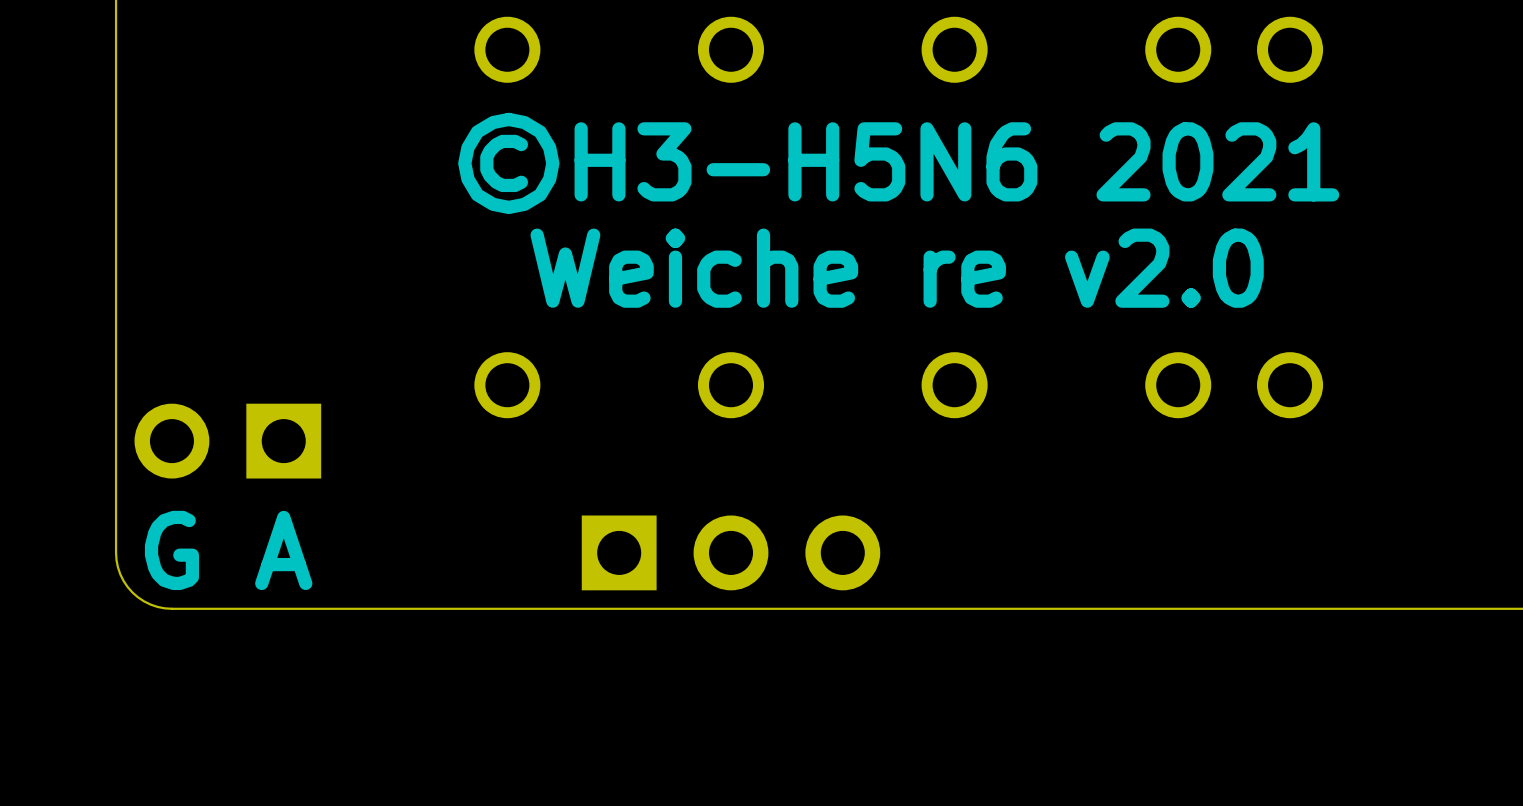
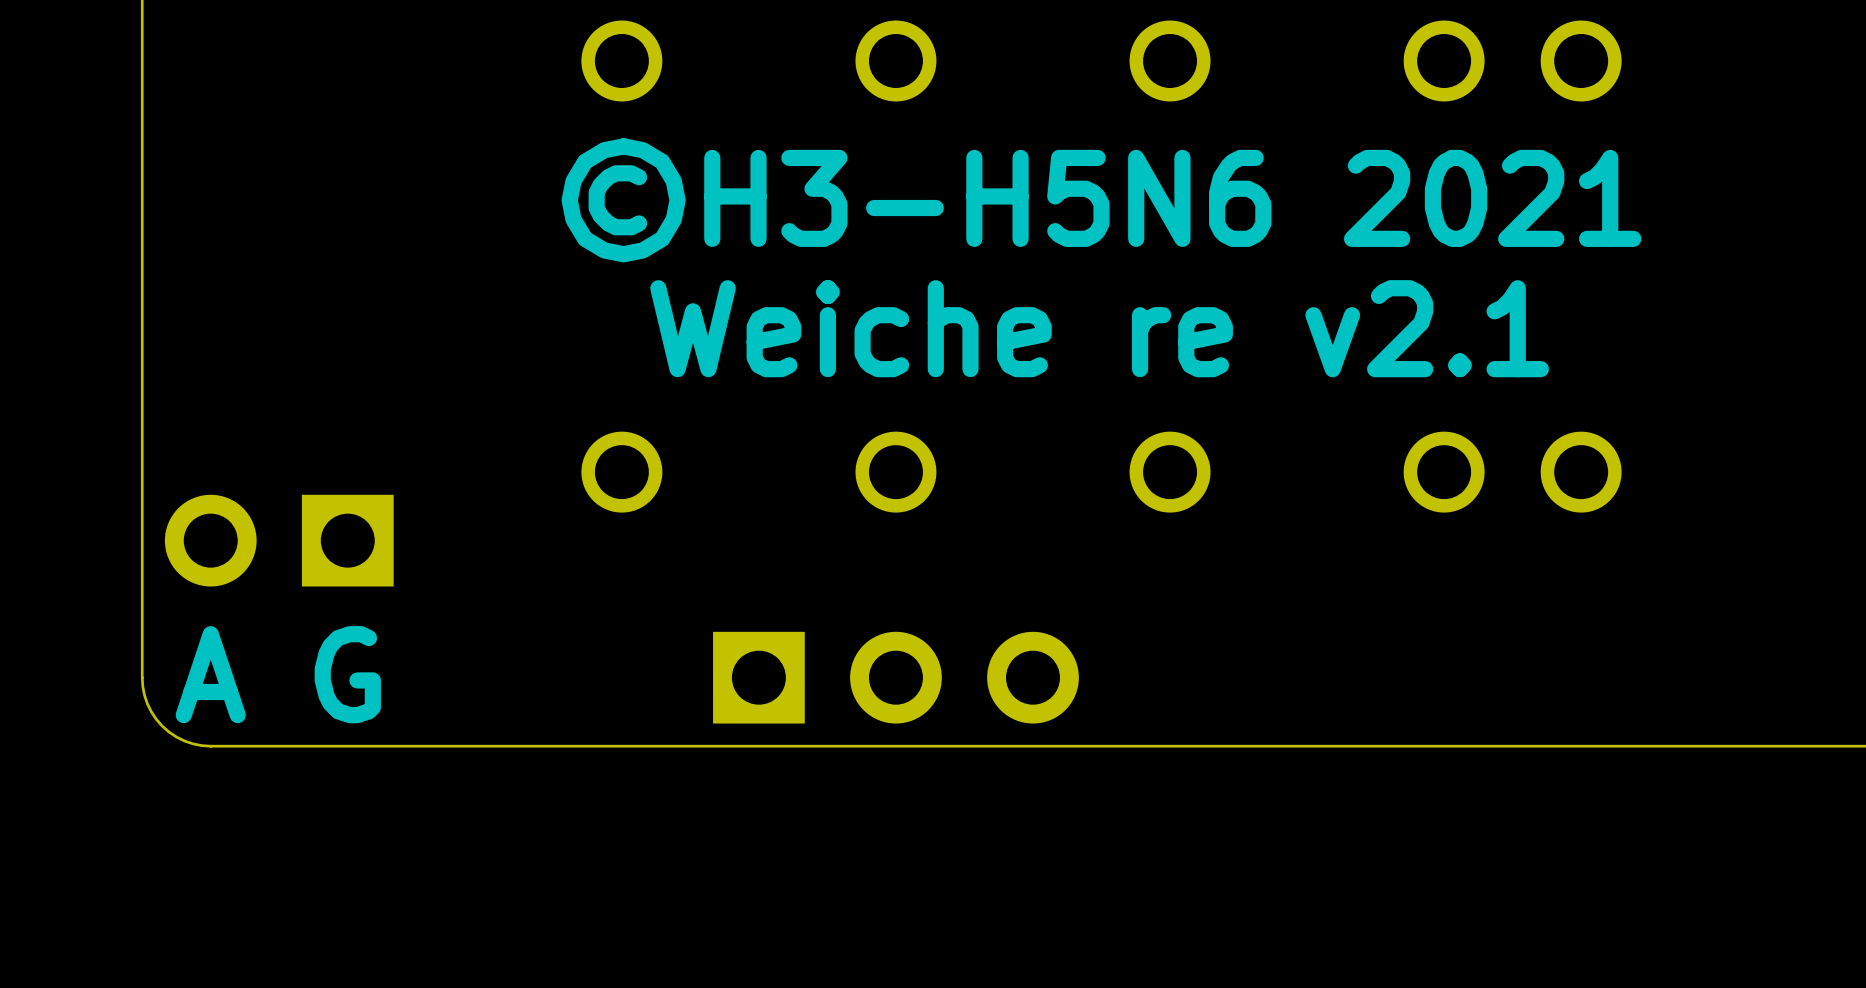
text: Weiche re v2.0 (897, 268) -> Weiche re v2.1 (1099, 328)
text: G (171, 550) -> A (210, 674)
text: A (283, 550) -> G (347, 674)

